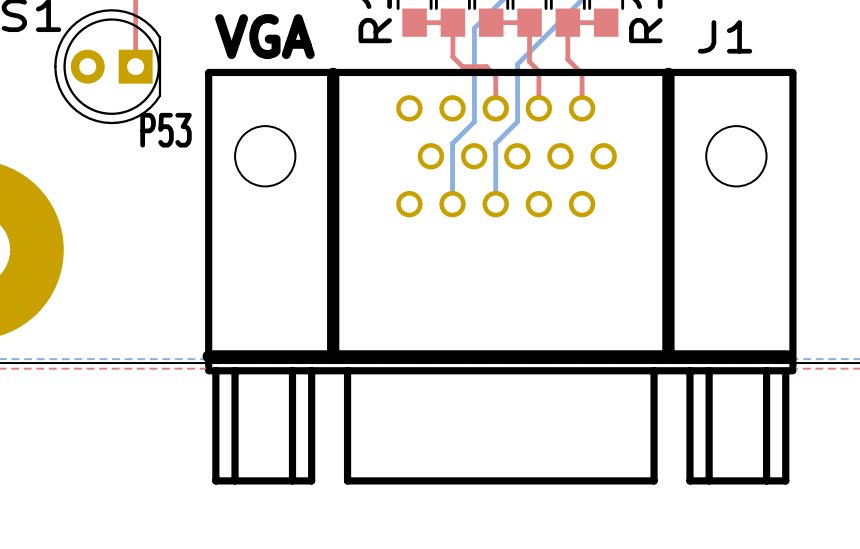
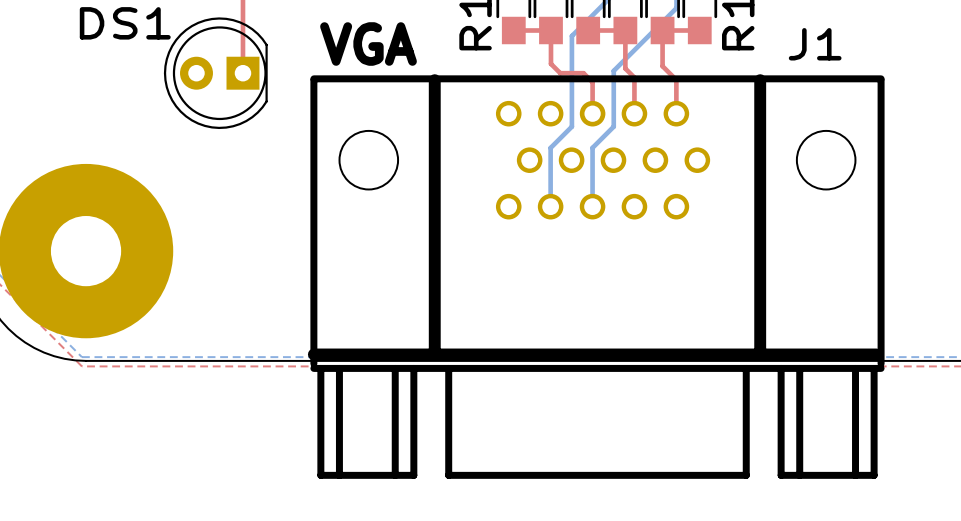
text: P53 (166, 130) -> none

